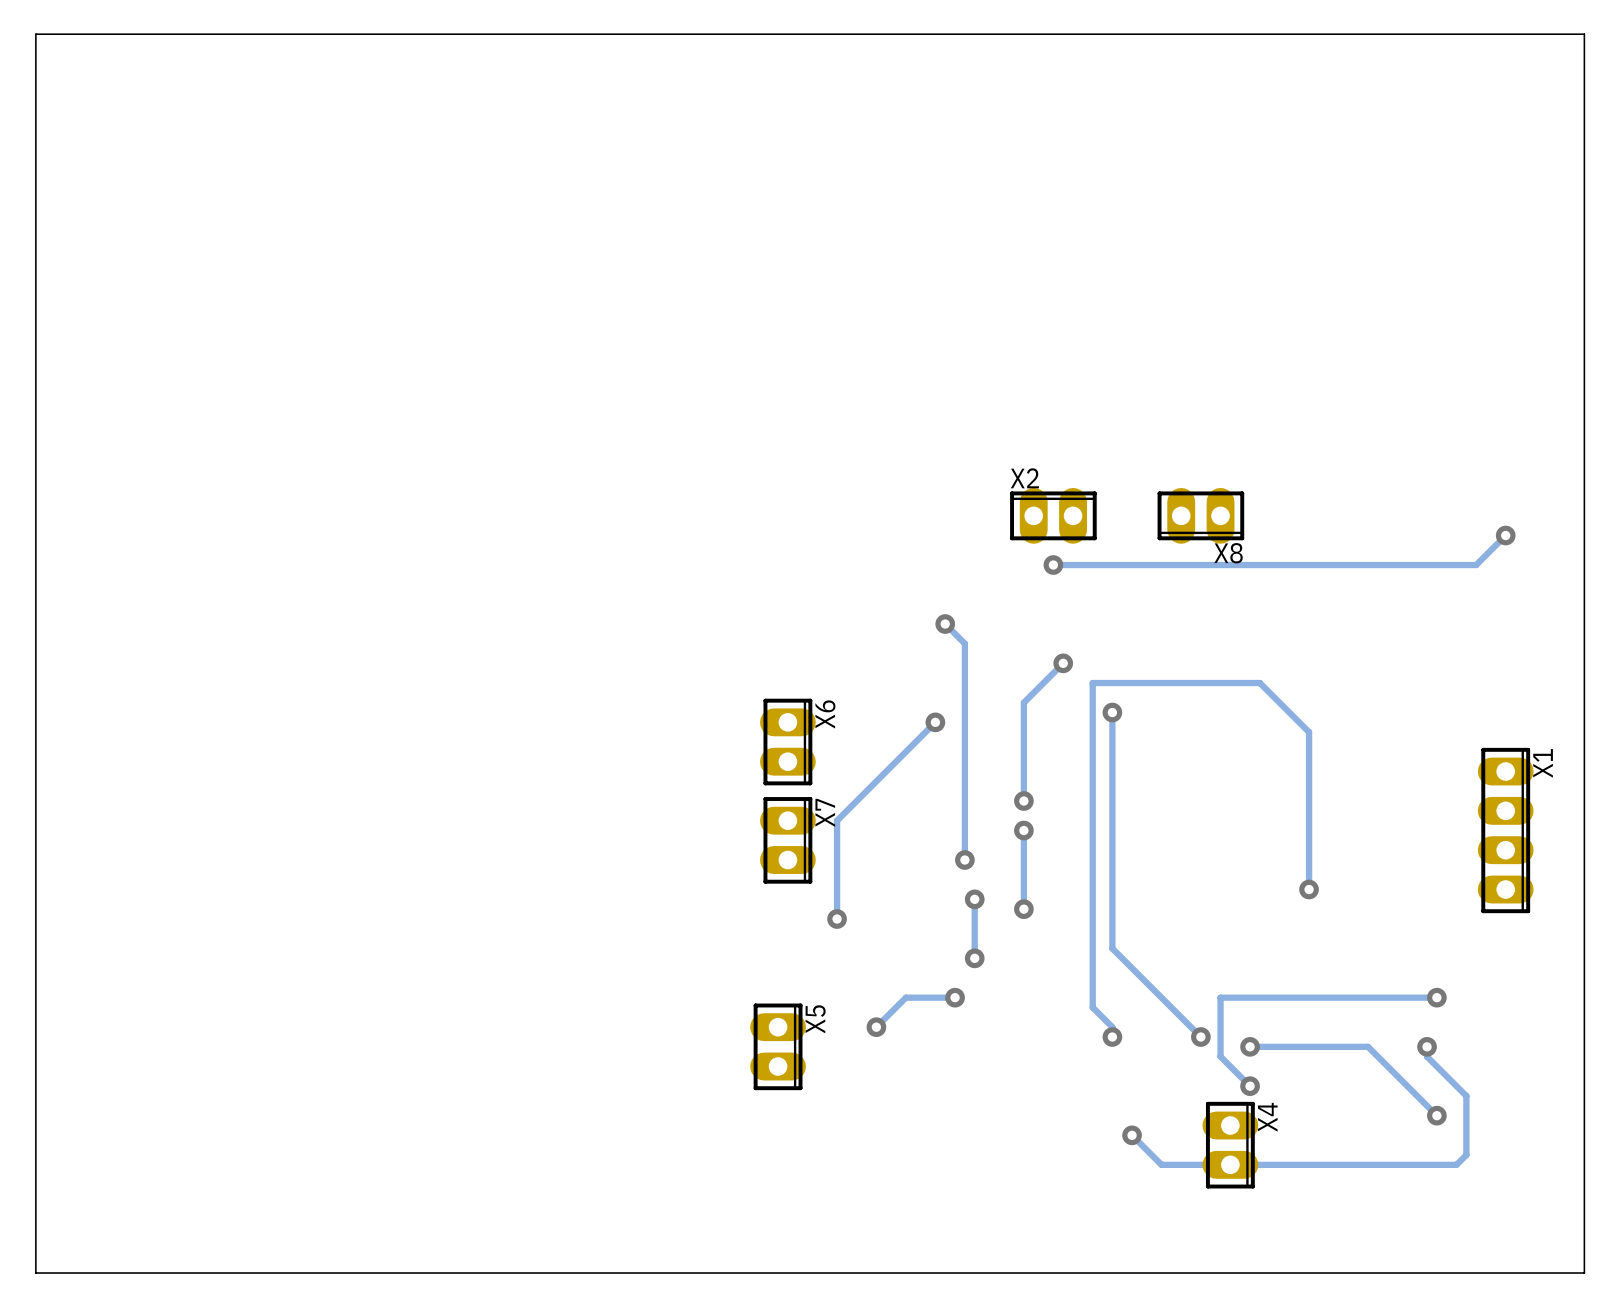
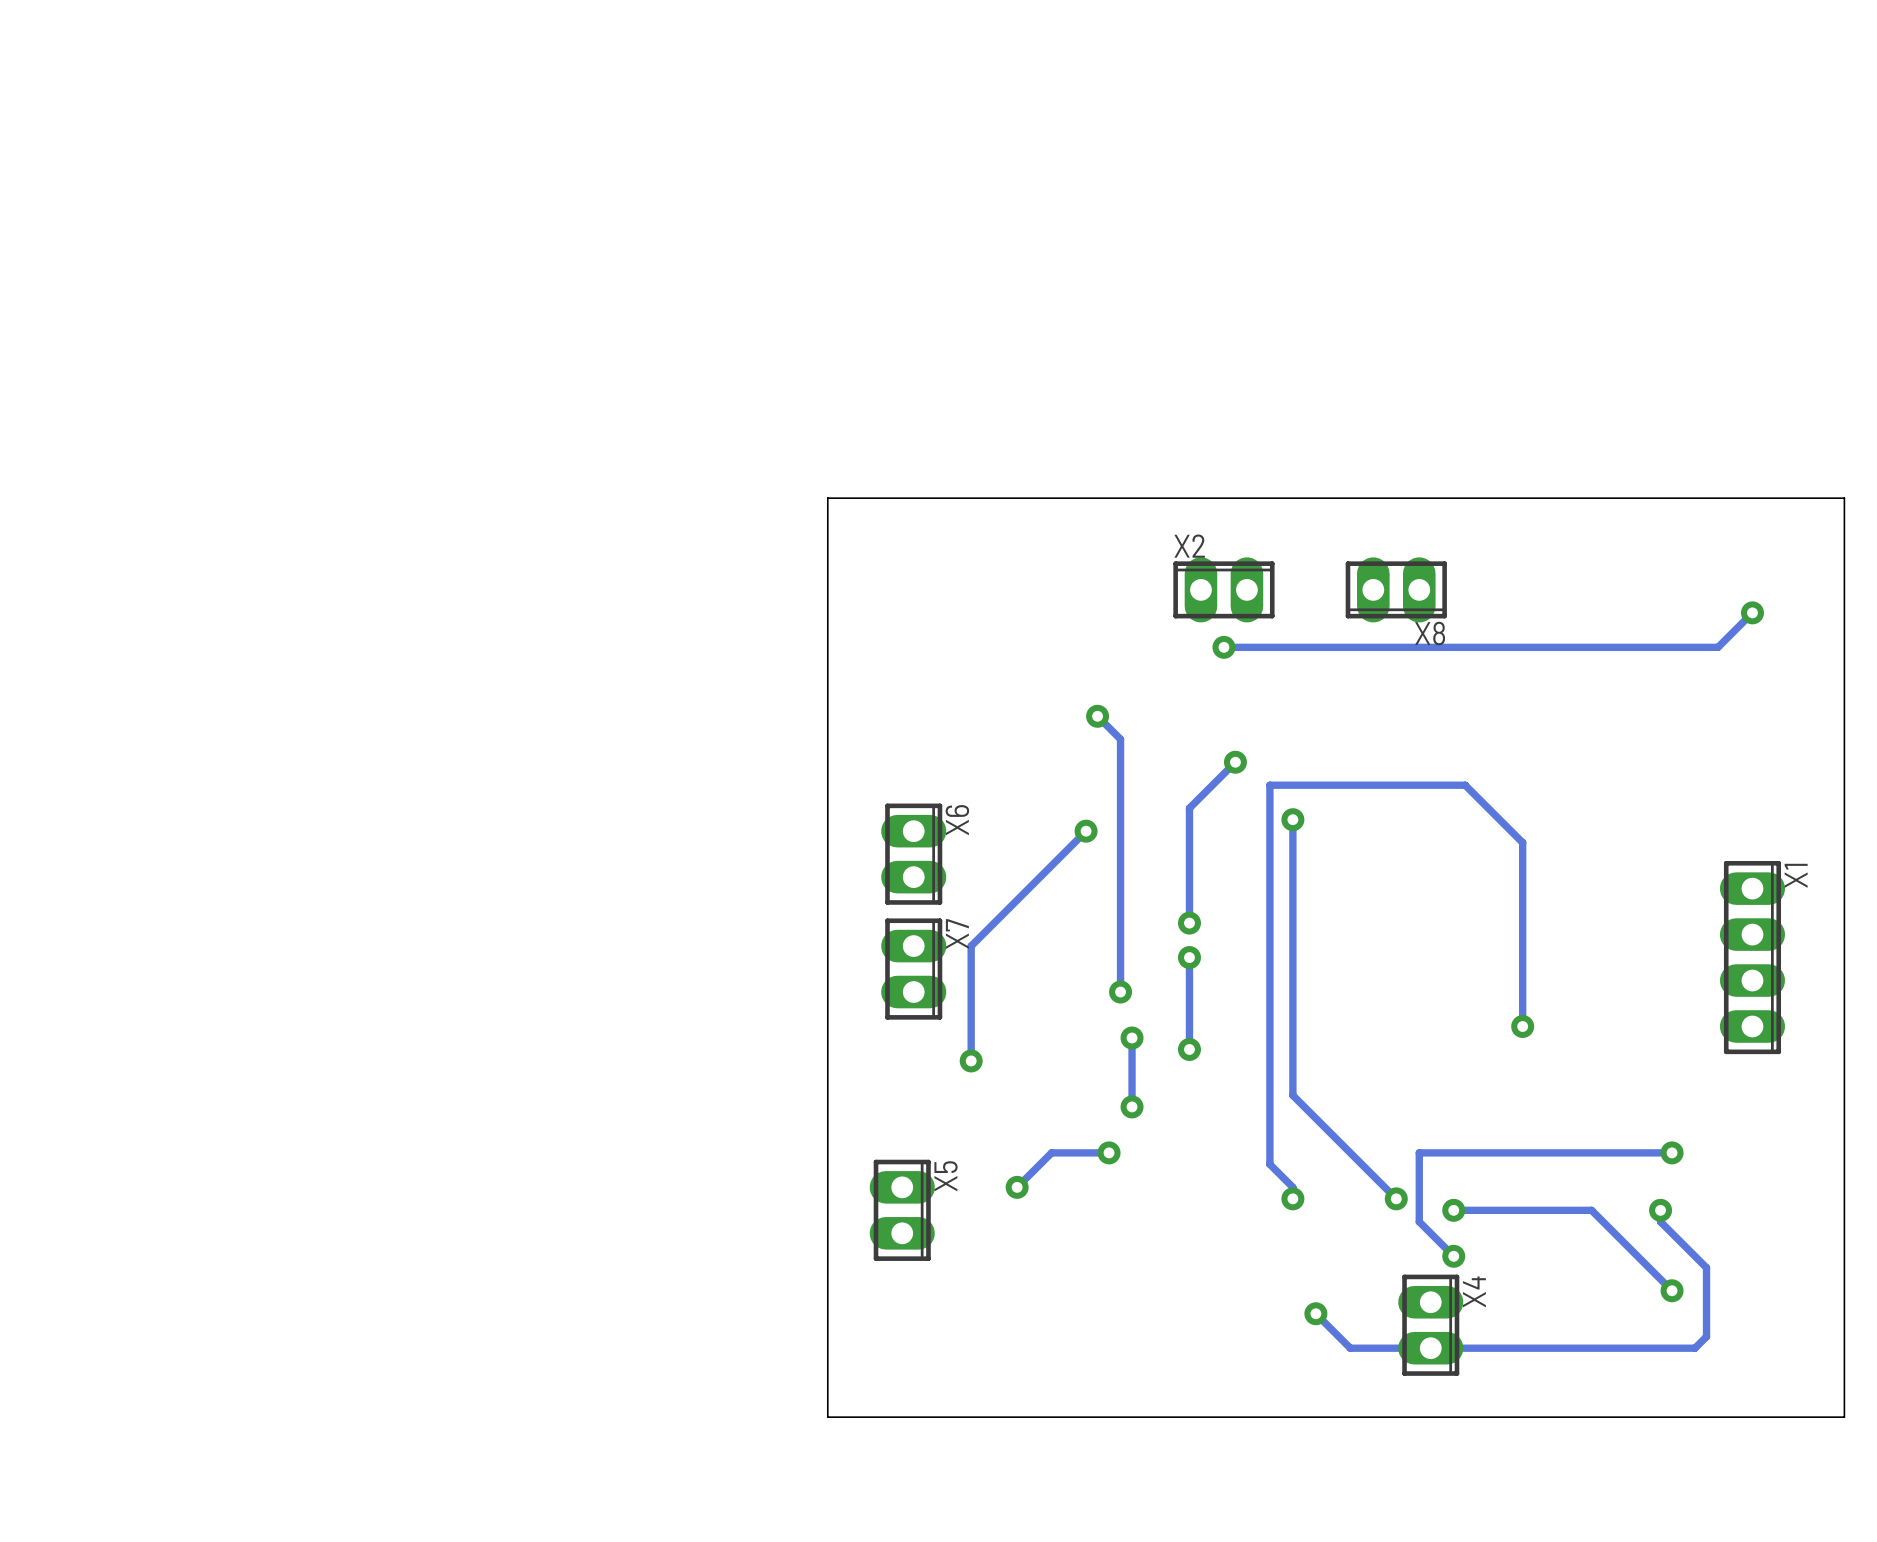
board edge: (1584, 437) (1584, 34) (35, 34) (35, 1273) (1584, 1273) (1584, 1223) -> (1844, 498) (827, 498) (827, 1417) (1844, 1417)

